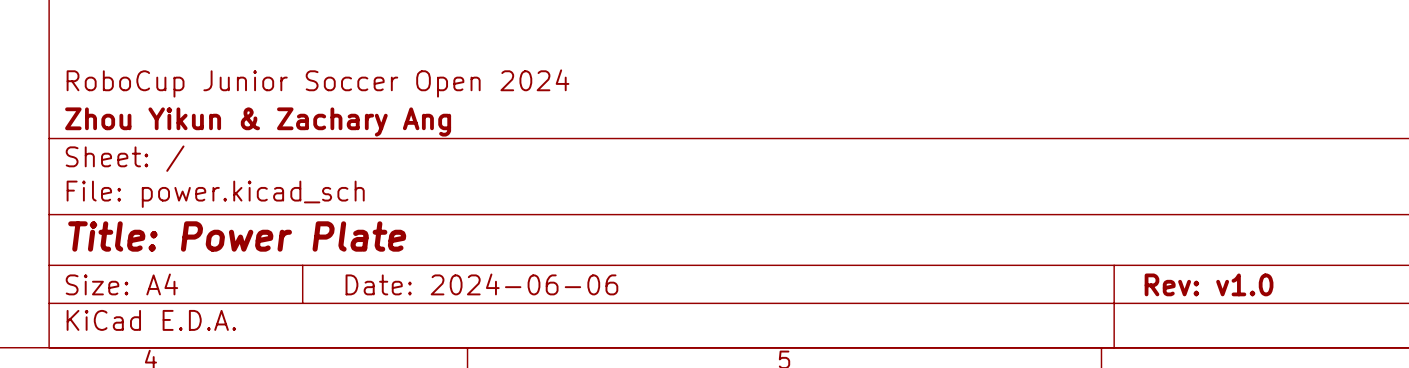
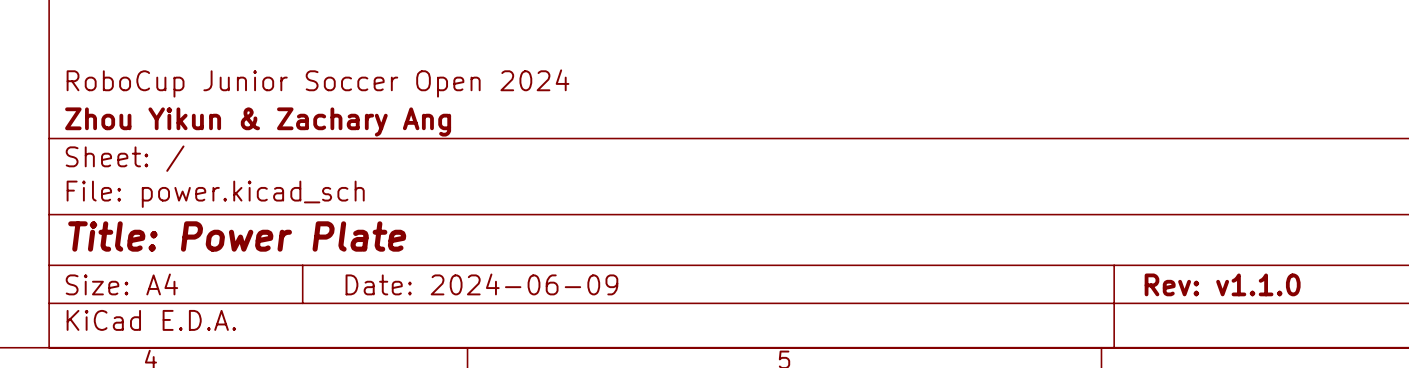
title block: Date: 2024-06-06 (481, 284) -> Date: 2024-06-09 (481, 284)
title block: Rev: v1.0 (1209, 284) -> Rev: v1.1.0 (1222, 284)

